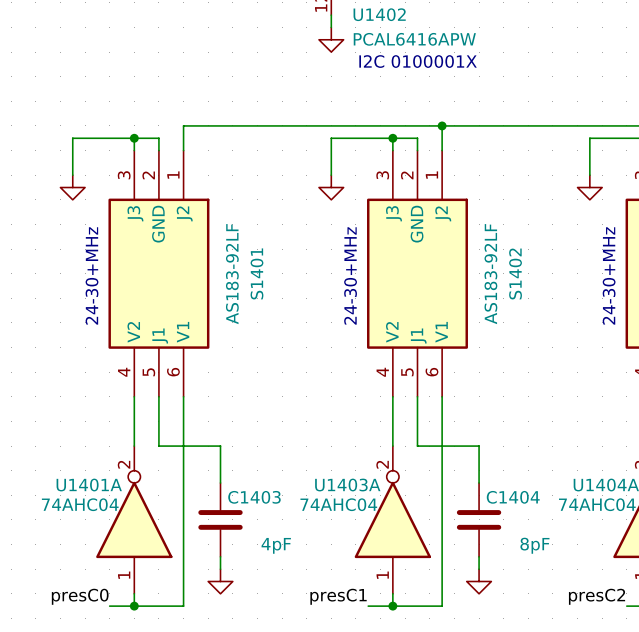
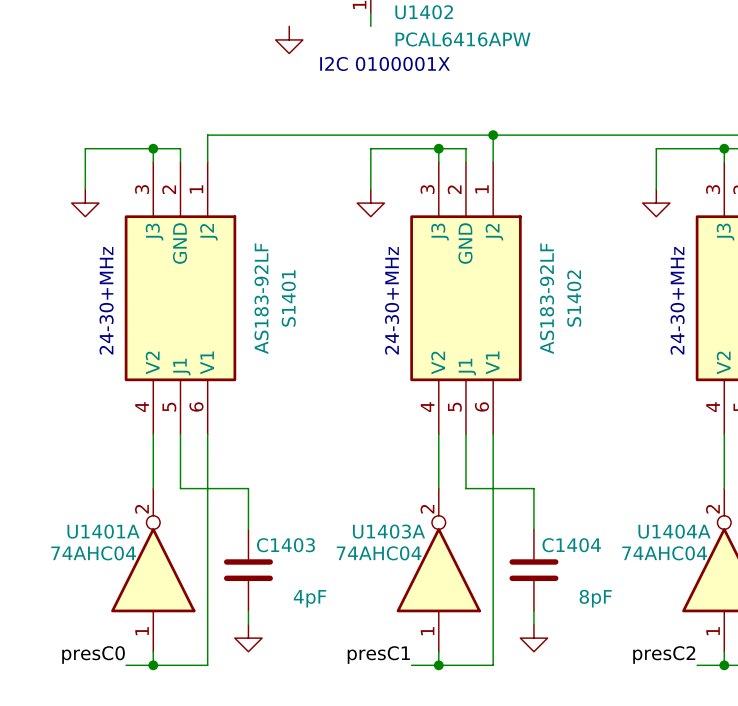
power symbol position: (331, 39) -> (289, 39)
text position: I2C 0100001X (418, 61) -> I2C 0100001X (385, 63)

